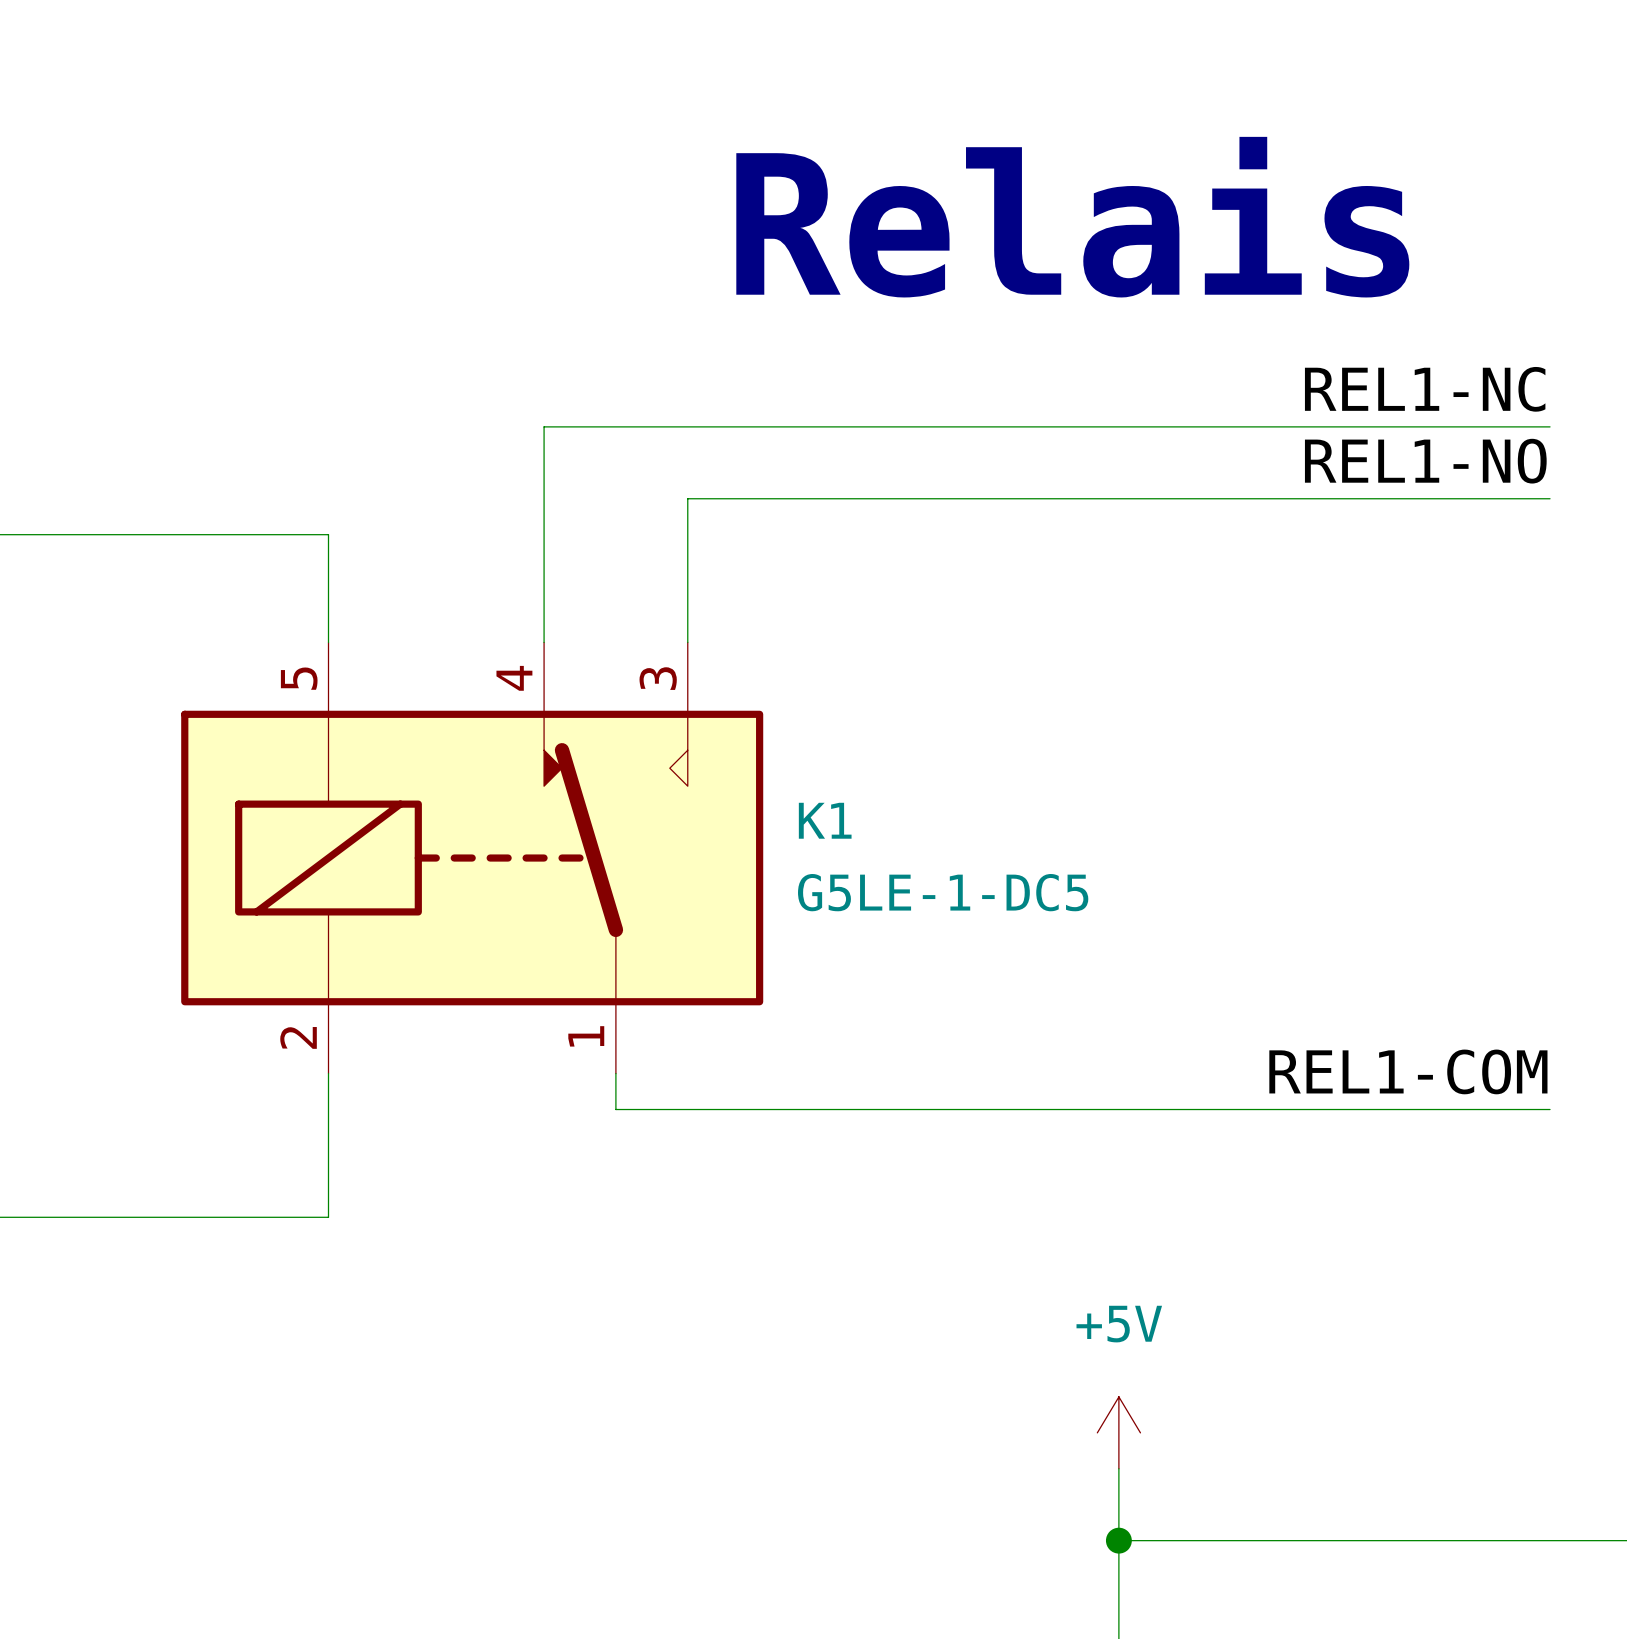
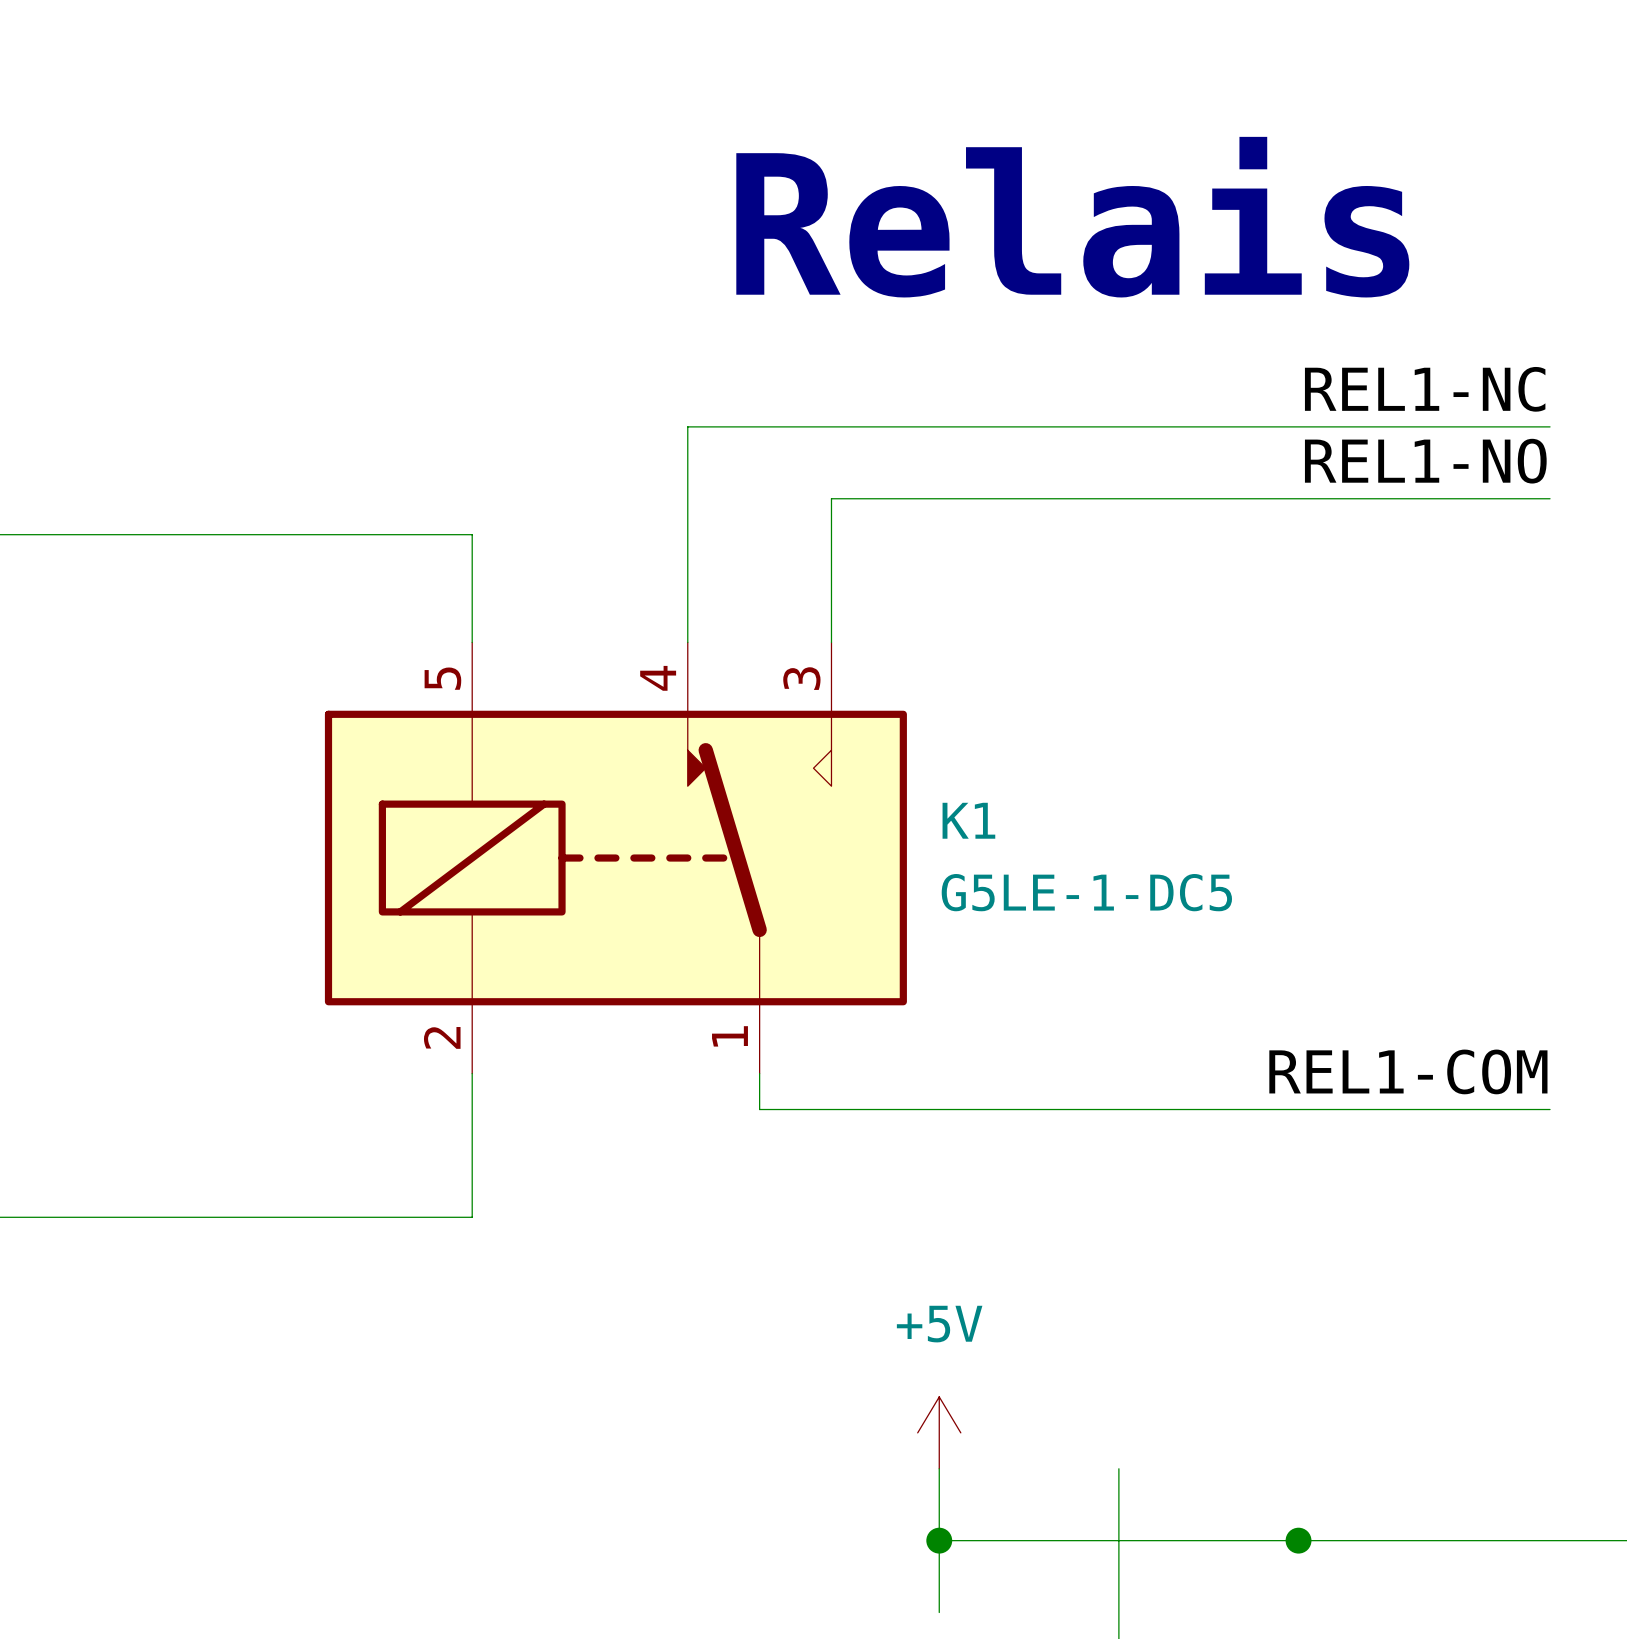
wire: (687, 426) (544, 426) (544, 642) -> none
wire: (687, 498) (831, 498) -> (687, 498) (687, 426)
wire: none -> (831, 498) (831, 642)
wire: (328, 534) (328, 642) -> (328, 534) (472, 534) (472, 642)
K1 position: (472, 858) -> (615, 858)
wire: (328, 1073) (328, 1217) -> (472, 1073) (472, 1217) (328, 1217)
wire: (615, 1073) (615, 1109) (759, 1109) -> (759, 1073) (759, 1109)
power symbol position: +5V (1118, 1432) -> +5V (939, 1432)
wire: none -> (939, 1468) (939, 1612)
wire: none -> (939, 1540) (1118, 1540)
junction: none -> (939, 1540)
junction: (1118, 1540) -> none
junction: none -> (1298, 1540)

